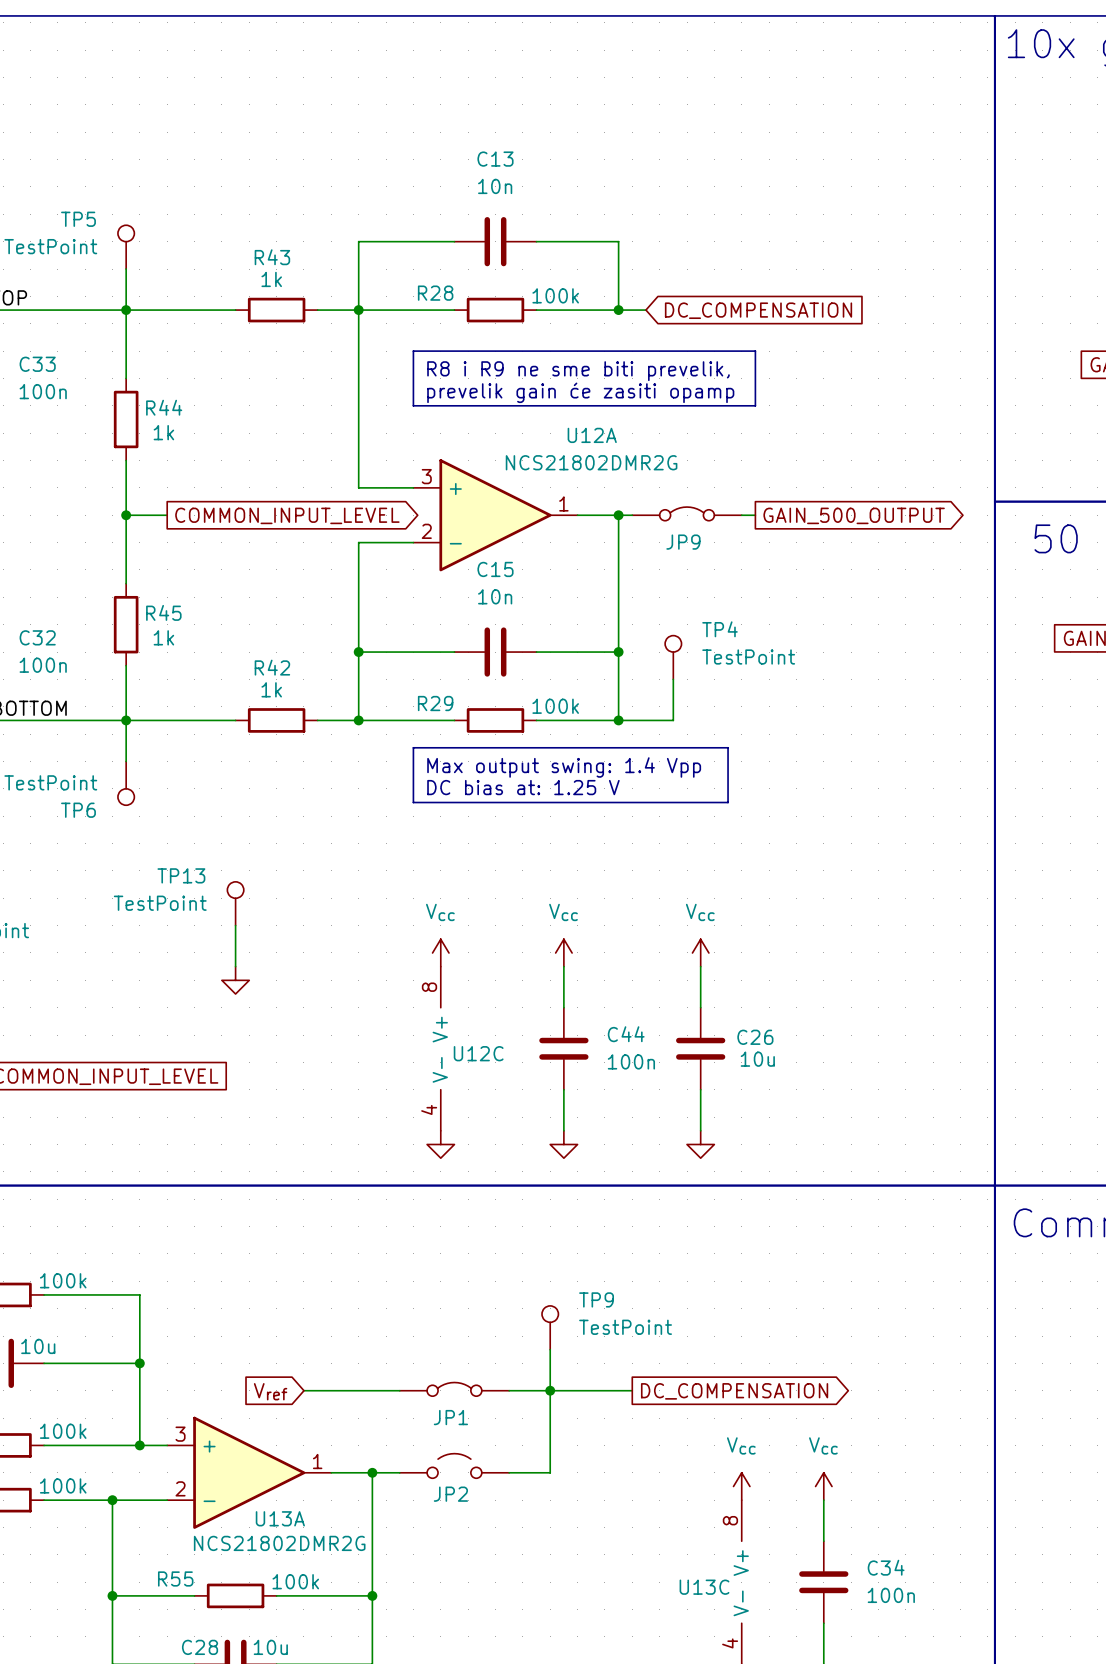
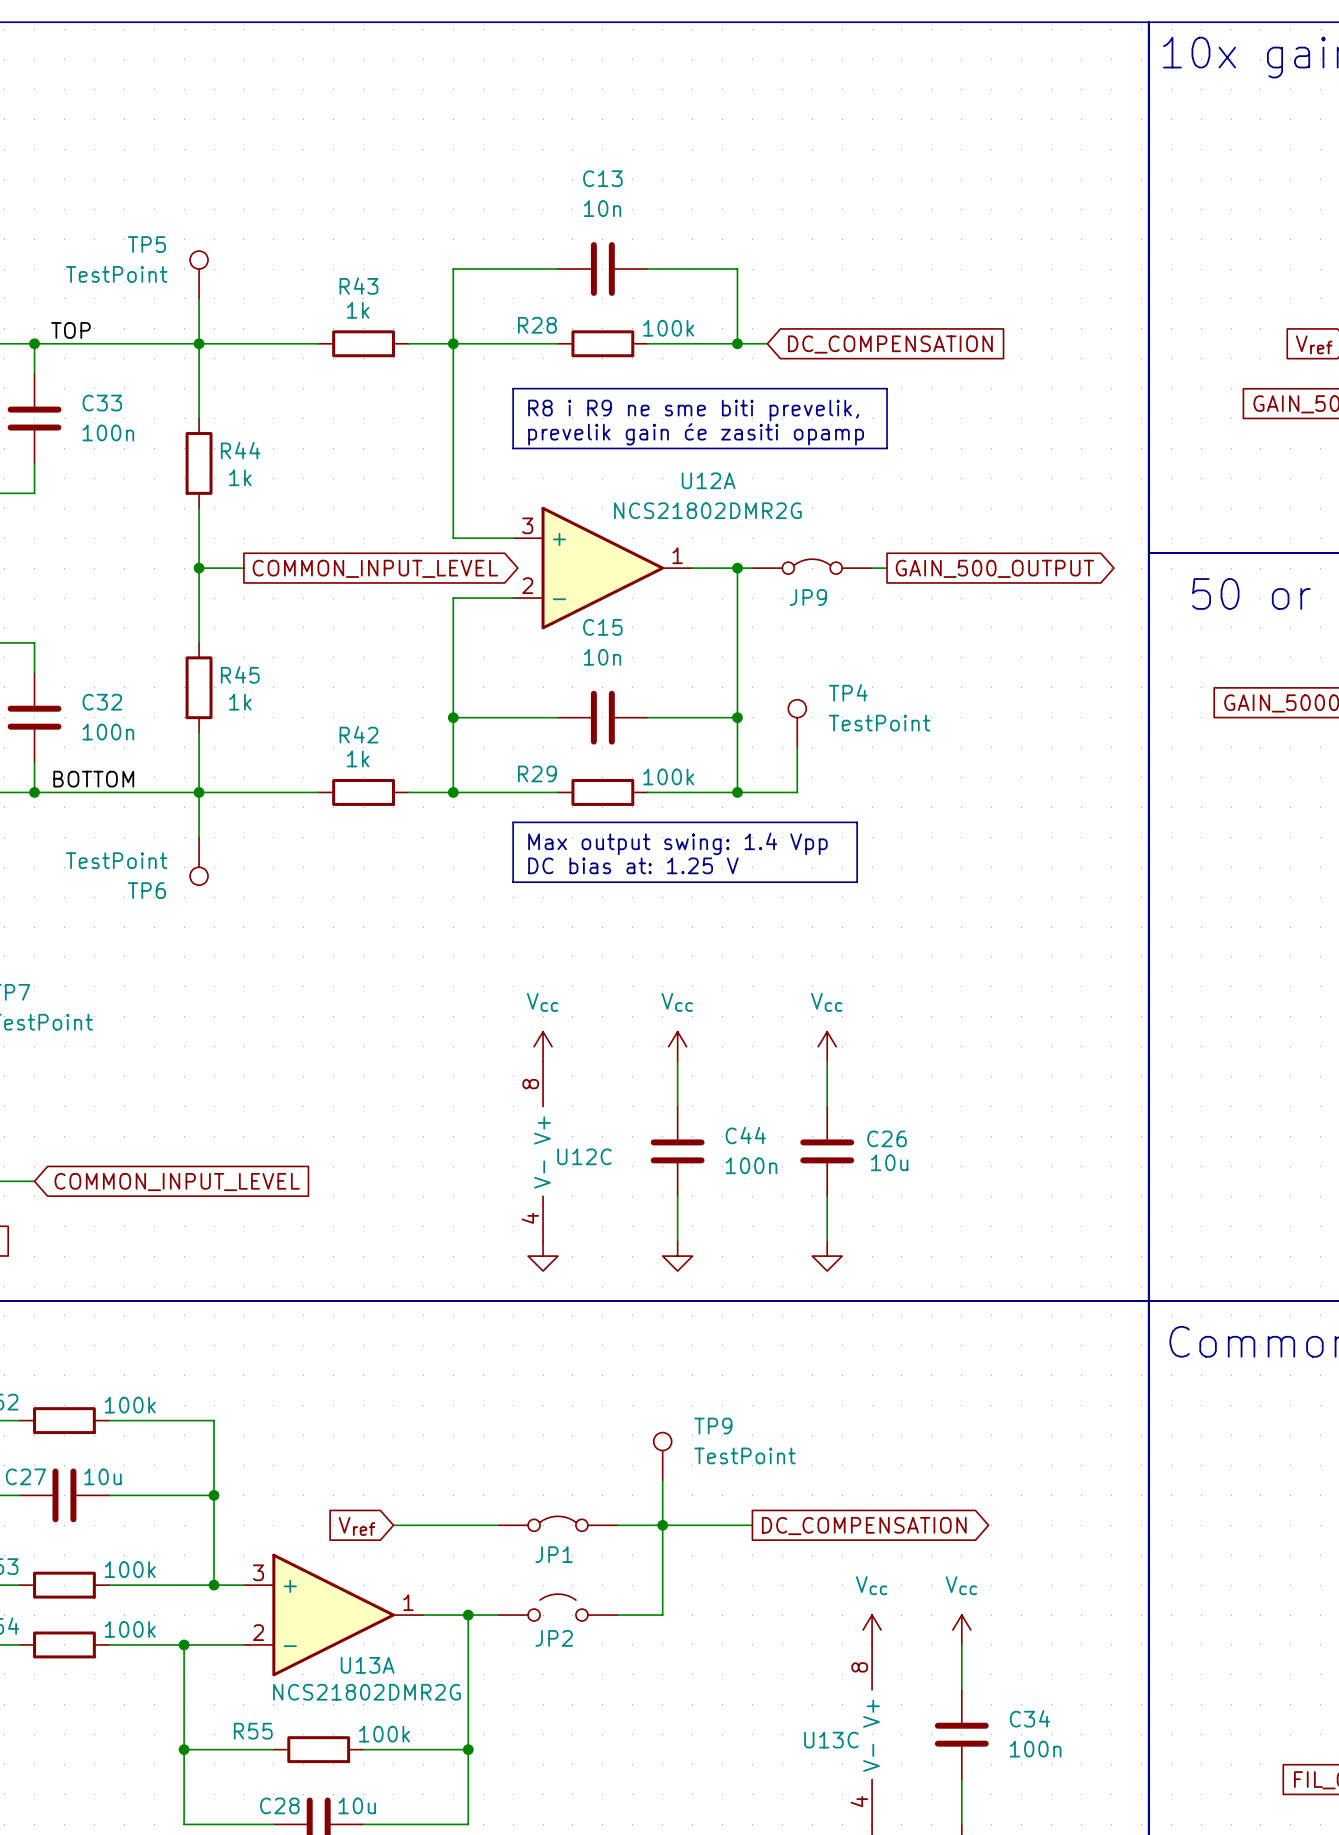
TP13: TestPoint (235, 903) -> none
wire: (235, 925) (235, 966) -> none
power symbol: (235, 980) -> none

